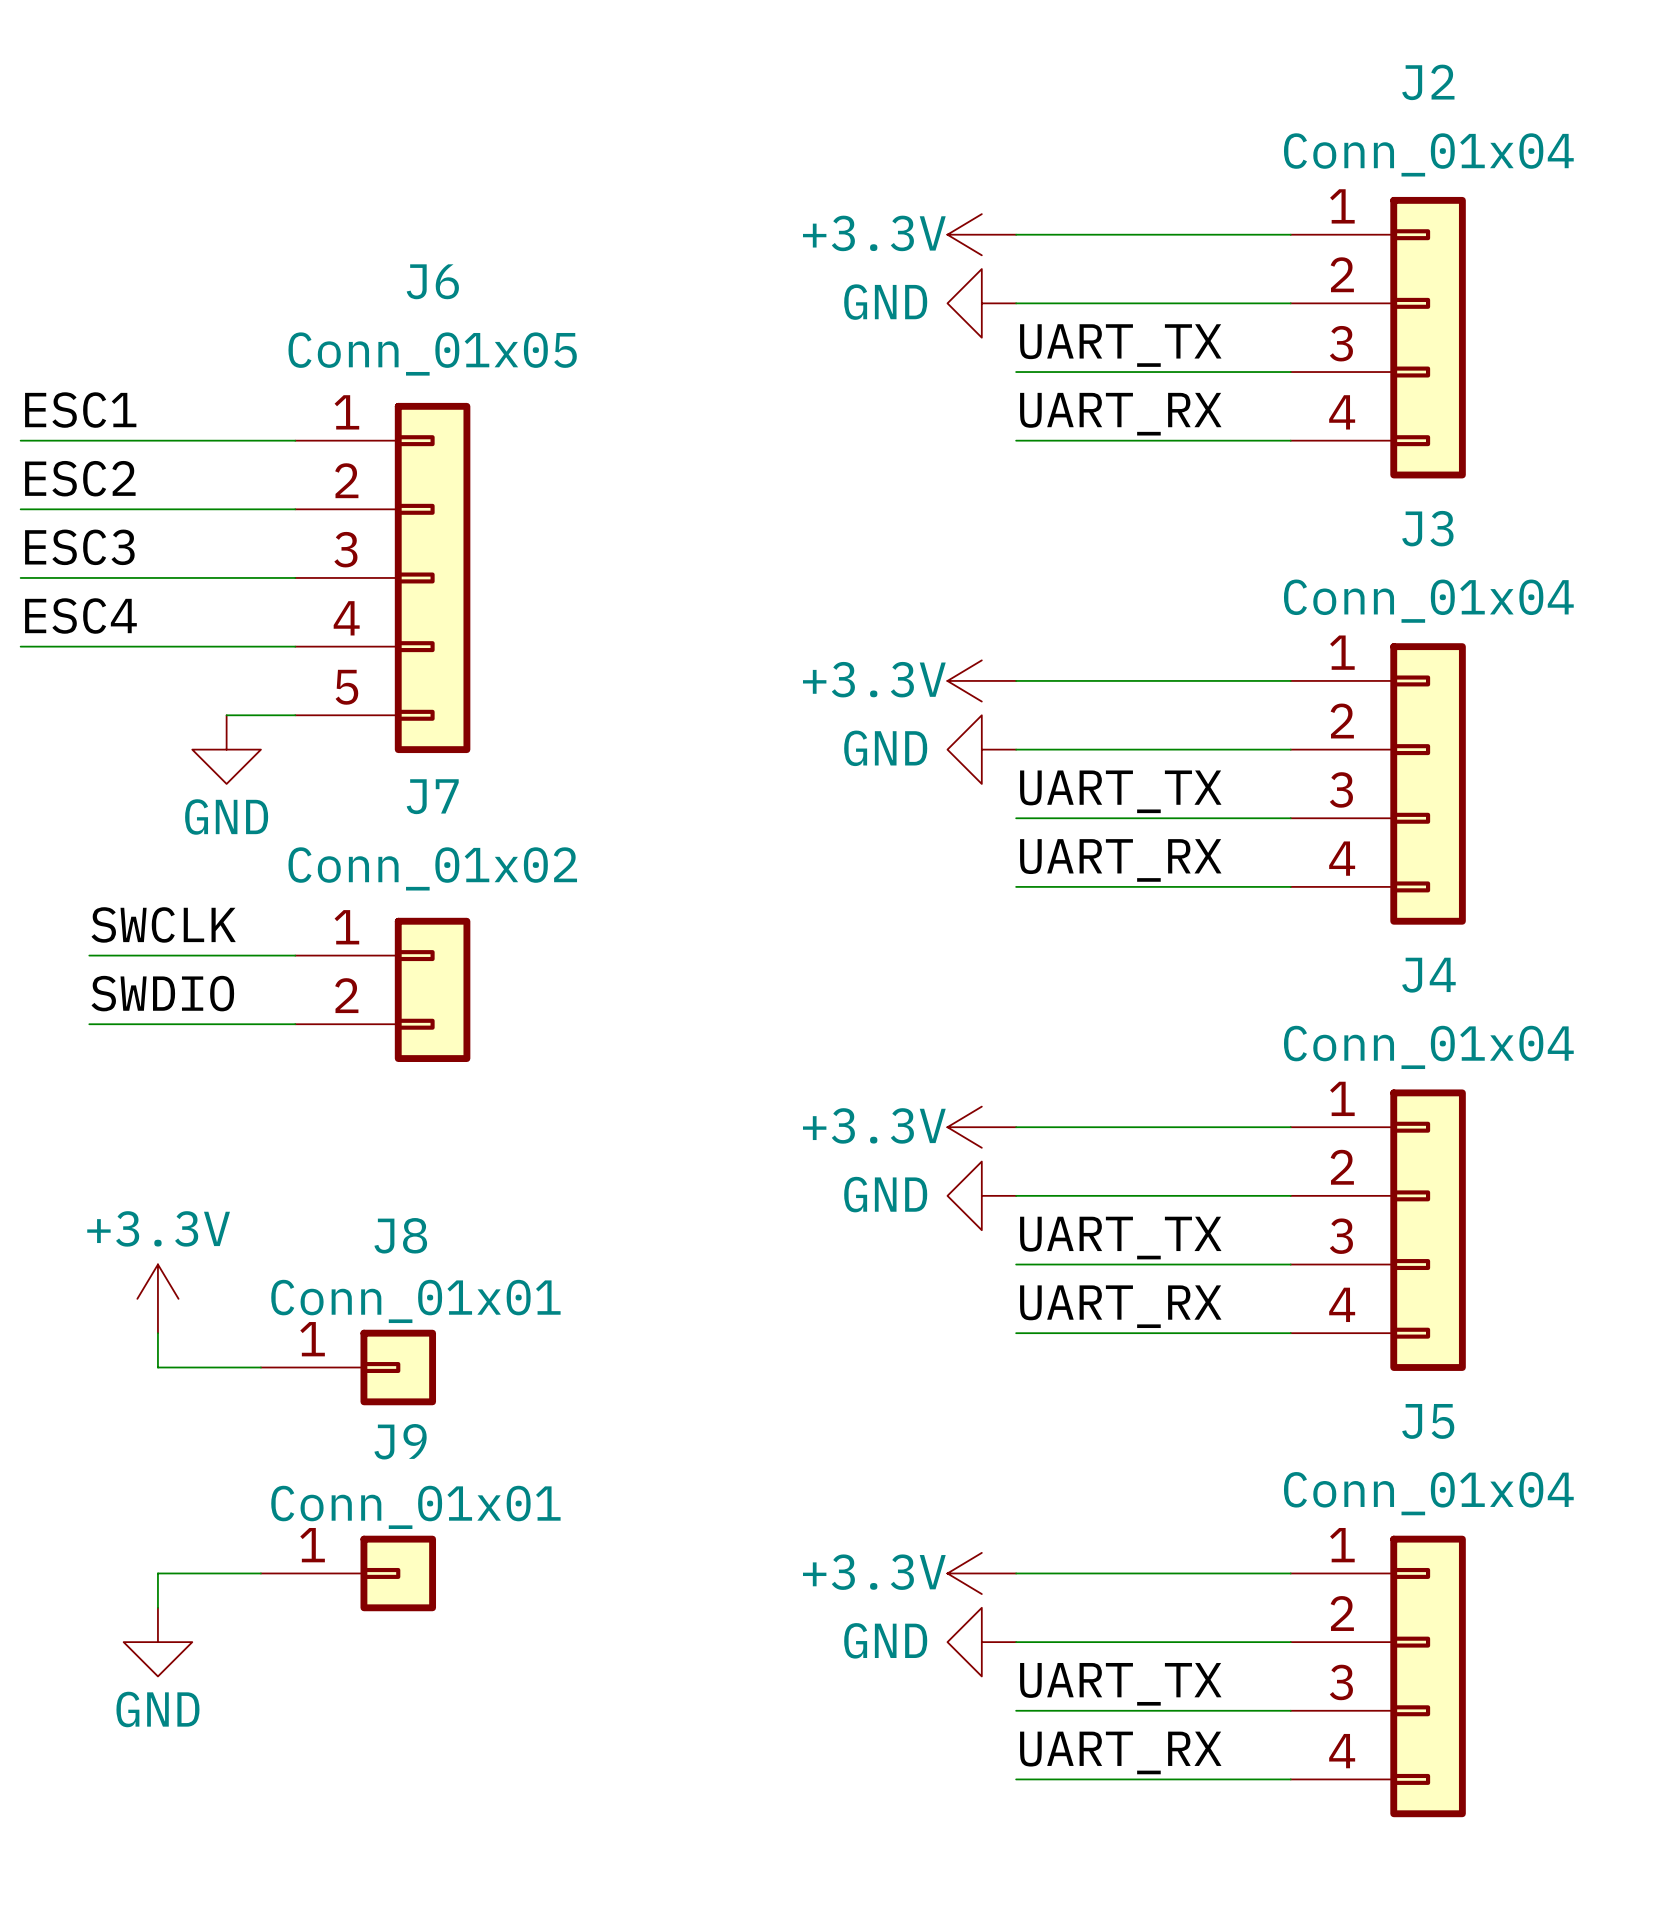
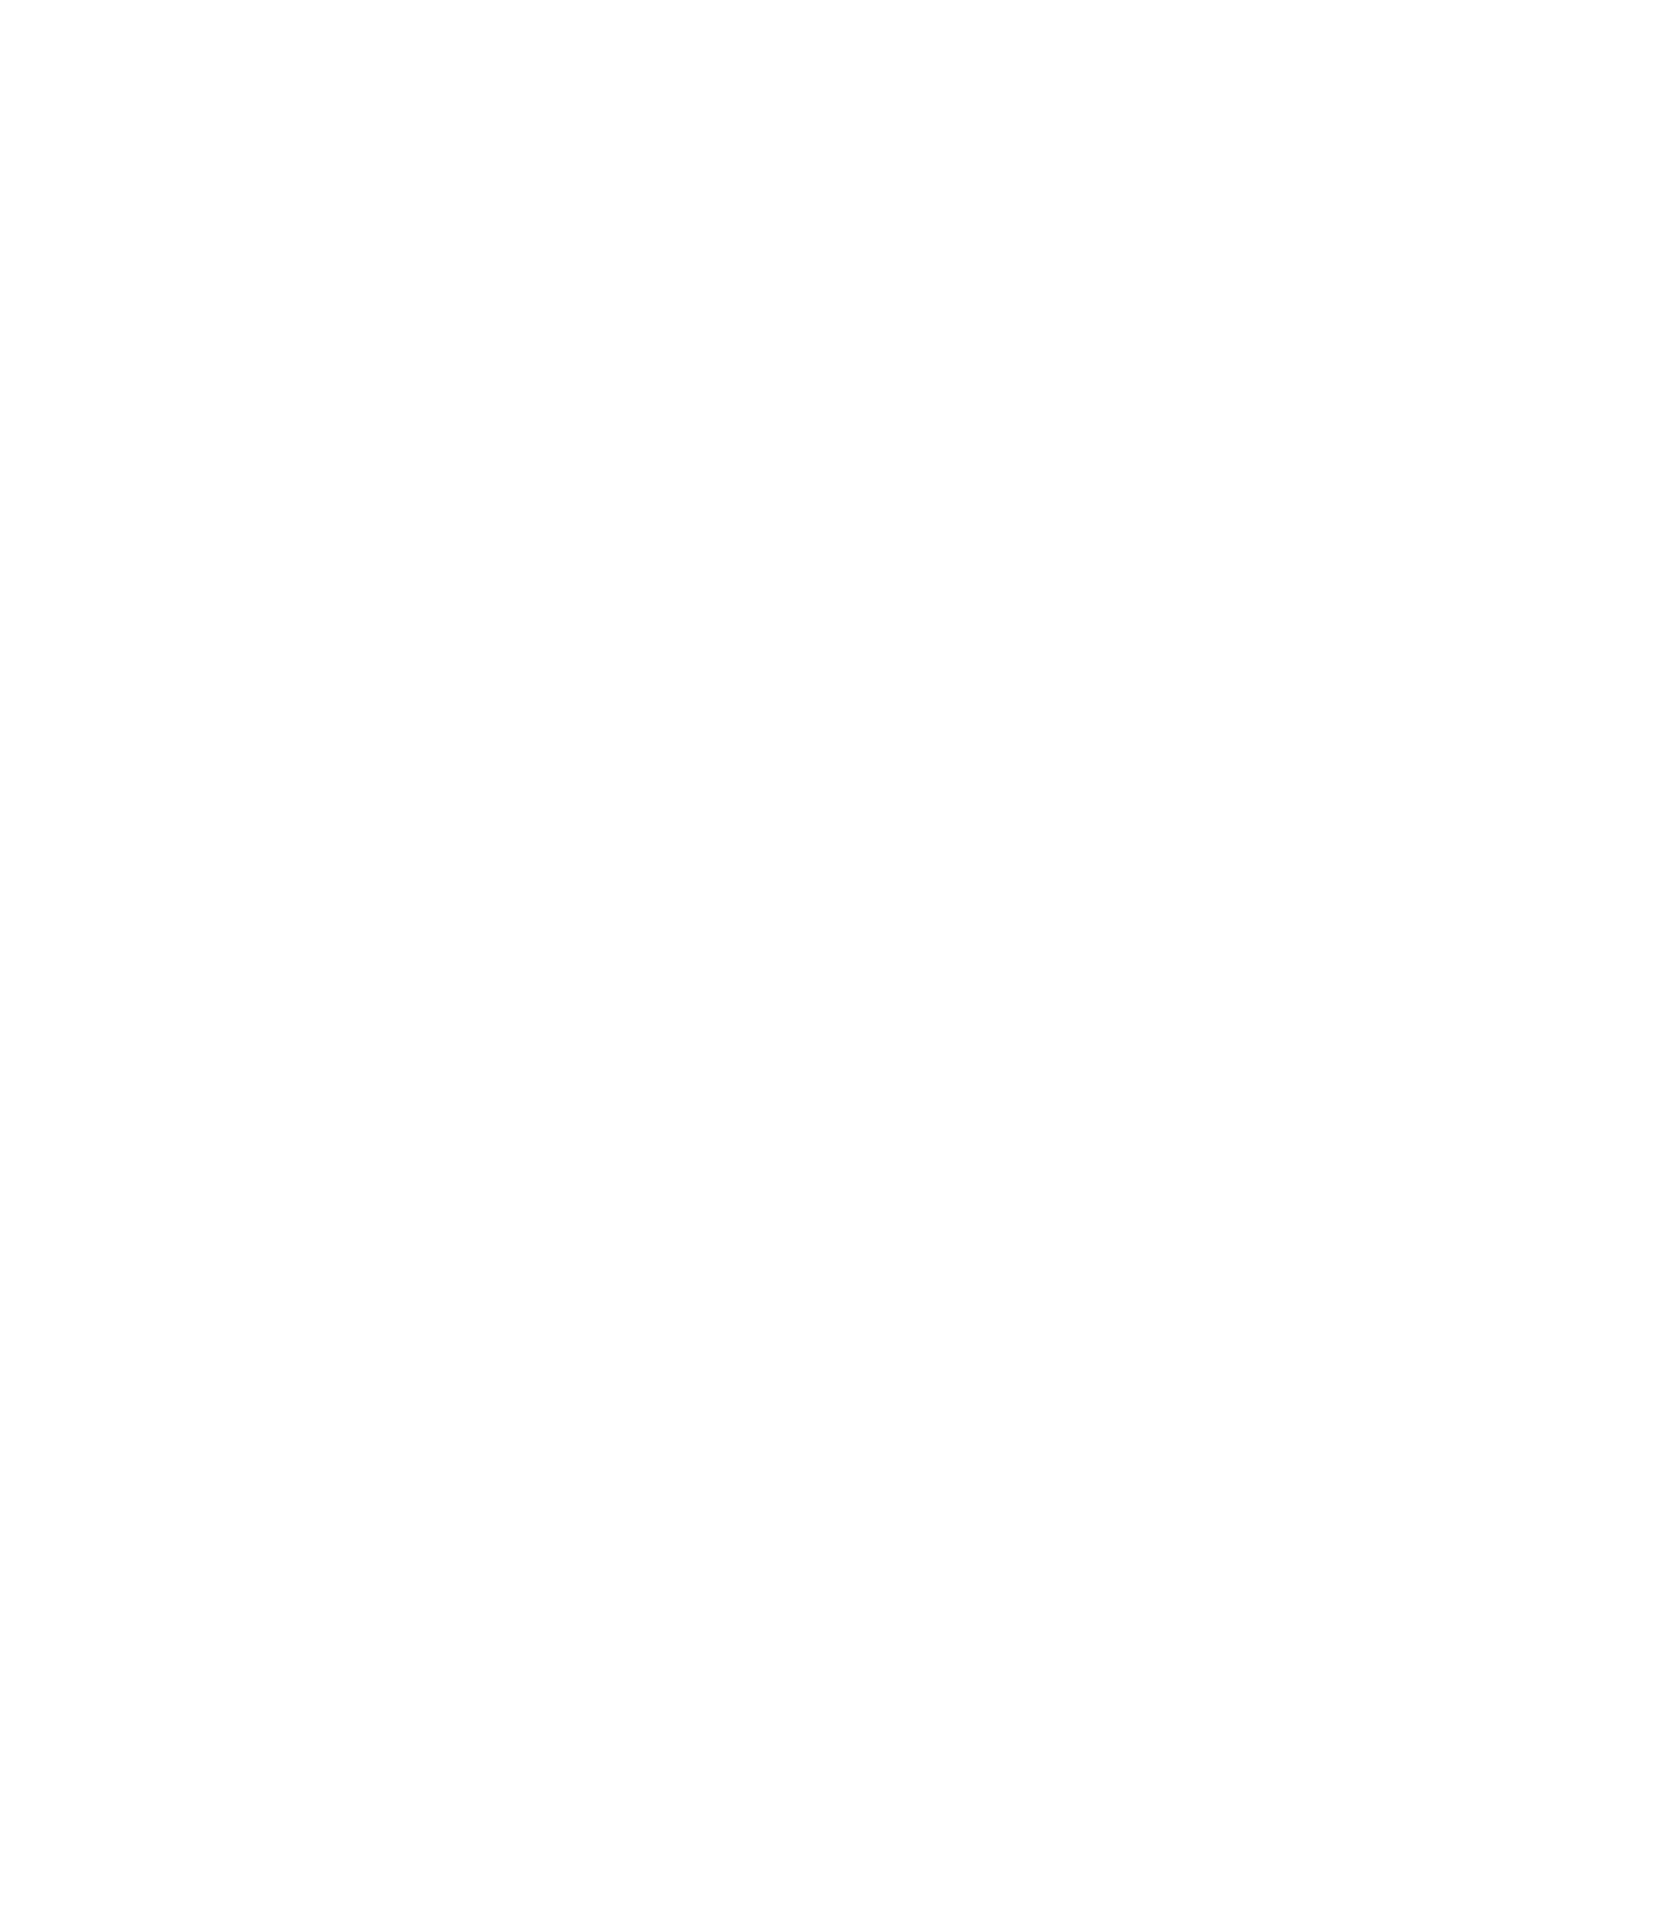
power symbol: +3.3V (981, 234) -> none
wire: (1016, 234) (1290, 234) -> none
power symbol: GND (981, 303) -> none
wire: (1016, 303) (1290, 303) -> none
J2: Conn_01x04 (1378, 337) -> none
label: UART_TX (1120, 345) -> none
wire: (1016, 372) (1290, 372) -> none
label: ESC1 (80, 410) -> none
label: UART_RX (1120, 414) -> none
wire: (20, 440) (295, 440) -> none
wire: (1016, 440) (1290, 440) -> none
label: ESC2 (80, 478) -> none
wire: (20, 509) (295, 509) -> none
label: ESC3 (79, 547) -> none
wire: (20, 577) (295, 577) -> none
J6: Conn_01x05 (382, 577) -> none
label: ESC4 (80, 616) -> none
wire: (20, 646) (295, 646) -> none
power symbol: +3.3V (981, 680) -> none
wire: (1016, 680) (1290, 680) -> none
wire: (226, 715) (295, 715) -> none
power symbol: GND (226, 749) -> none
power symbol: GND (981, 749) -> none
wire: (1016, 749) (1290, 749) -> none
J3: Conn_01x04 (1378, 783) -> none
label: UART_TX (1120, 791) -> none
wire: (1016, 818) (1290, 818) -> none
label: UART_RX (1120, 860) -> none
wire: (1016, 886) (1290, 886) -> none
label: SWCLK (163, 924) -> none
wire: (89, 955) (295, 955) -> none
J7: Conn_01x02 (382, 989) -> none
label: SWDIO (162, 993) -> none
wire: (89, 1024) (295, 1024) -> none
power symbol: +3.3V (981, 1127) -> none
wire: (1016, 1127) (1290, 1127) -> none
power symbol: GND (981, 1195) -> none
wire: (1016, 1195) (1290, 1195) -> none
J4: Conn_01x04 (1378, 1230) -> none
label: UART_TX (1120, 1238) -> none
wire: (1016, 1264) (1290, 1264) -> none
power symbol: +3.3V (157, 1298) -> none
label: UART_RX (1120, 1306) -> none
wire: (157, 1333) (157, 1367) (260, 1367) -> none
wire: (1016, 1333) (1290, 1333) -> none
J8: Conn_01x01 (348, 1367) -> none
wire: (260, 1573) (157, 1573) (157, 1607) -> none
J9: Conn_01x01 (348, 1573) -> none
power symbol: +3.3V (981, 1573) -> none
wire: (1016, 1573) (1290, 1573) -> none
power symbol: GND (157, 1642) -> none
power symbol: GND (981, 1642) -> none
wire: (1016, 1642) (1290, 1642) -> none
J5: Conn_01x04 (1378, 1676) -> none
label: UART_TX (1120, 1684) -> none
wire: (1016, 1710) (1290, 1710) -> none
label: UART_RX (1120, 1752) -> none
wire: (1016, 1779) (1290, 1779) -> none

